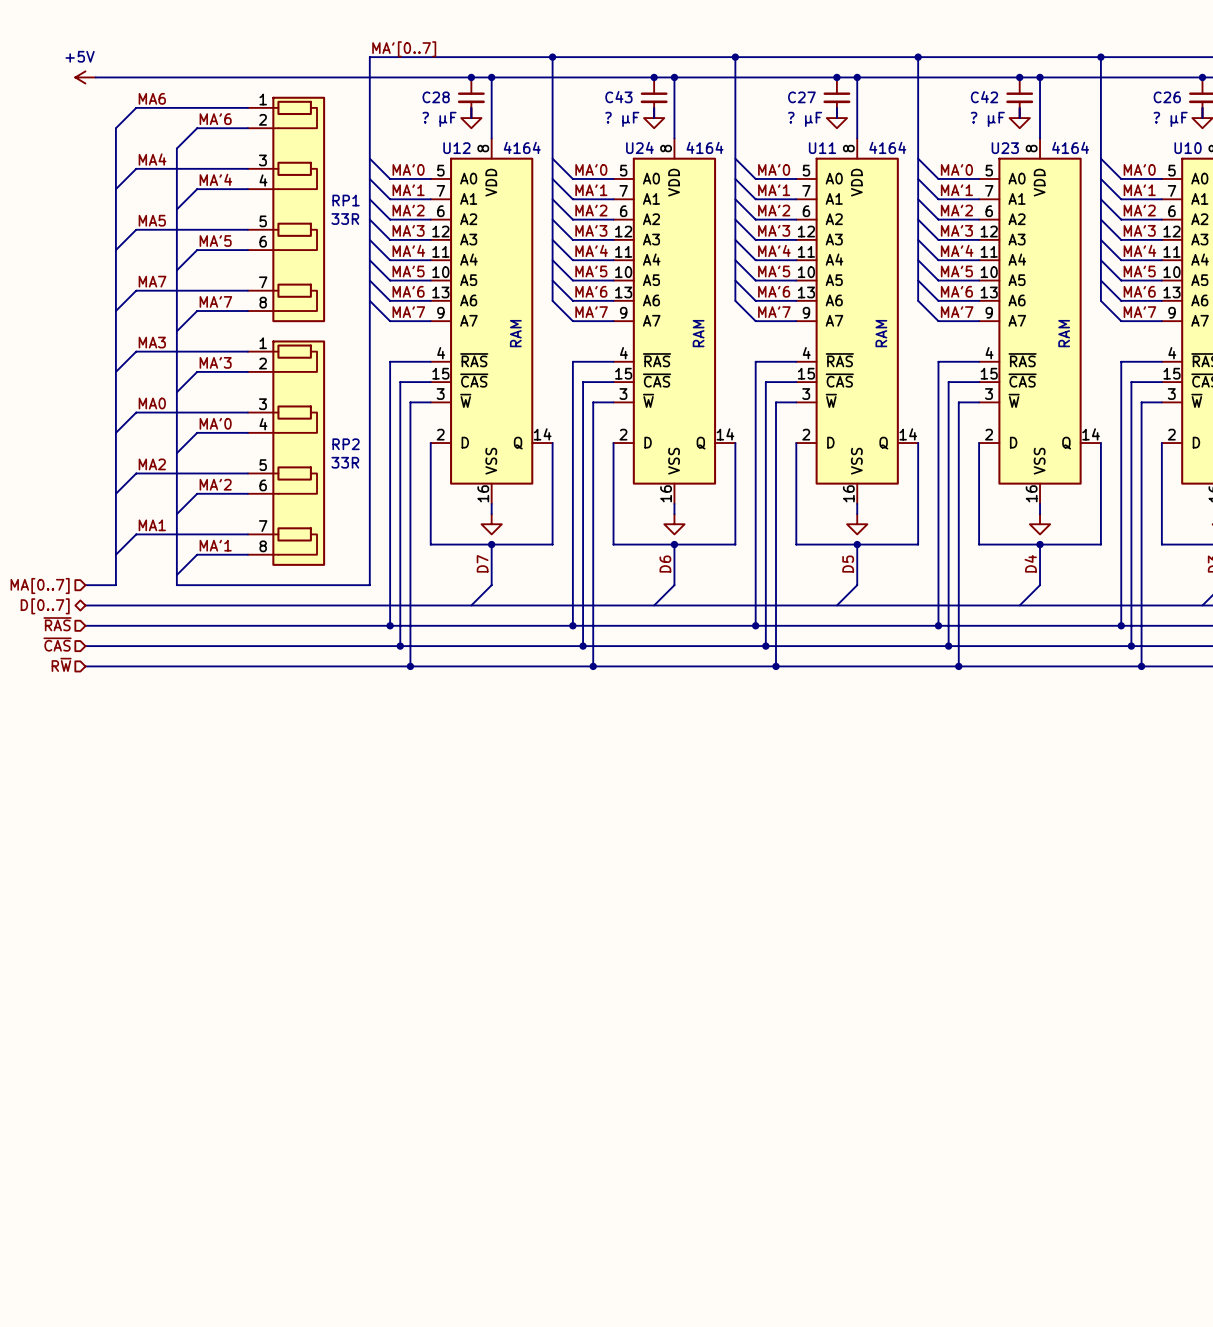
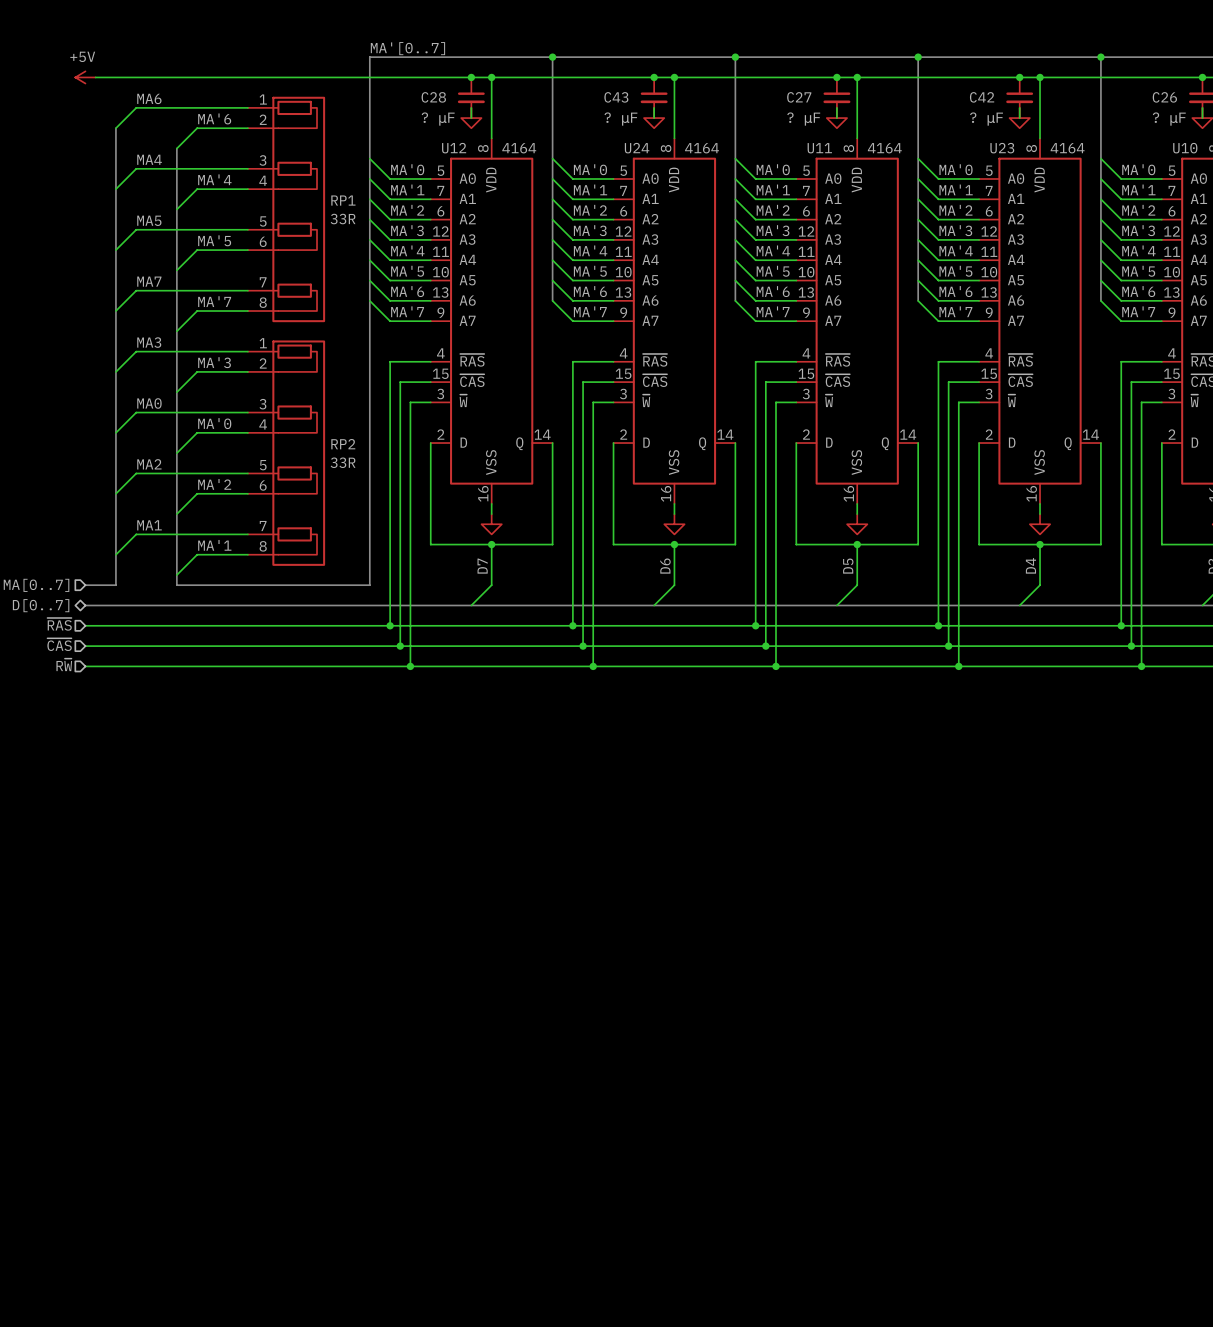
text: RAM (515, 333) -> none
text: RAM (698, 333) -> none
text: RAM (881, 333) -> none
text: RAM (1064, 333) -> none

